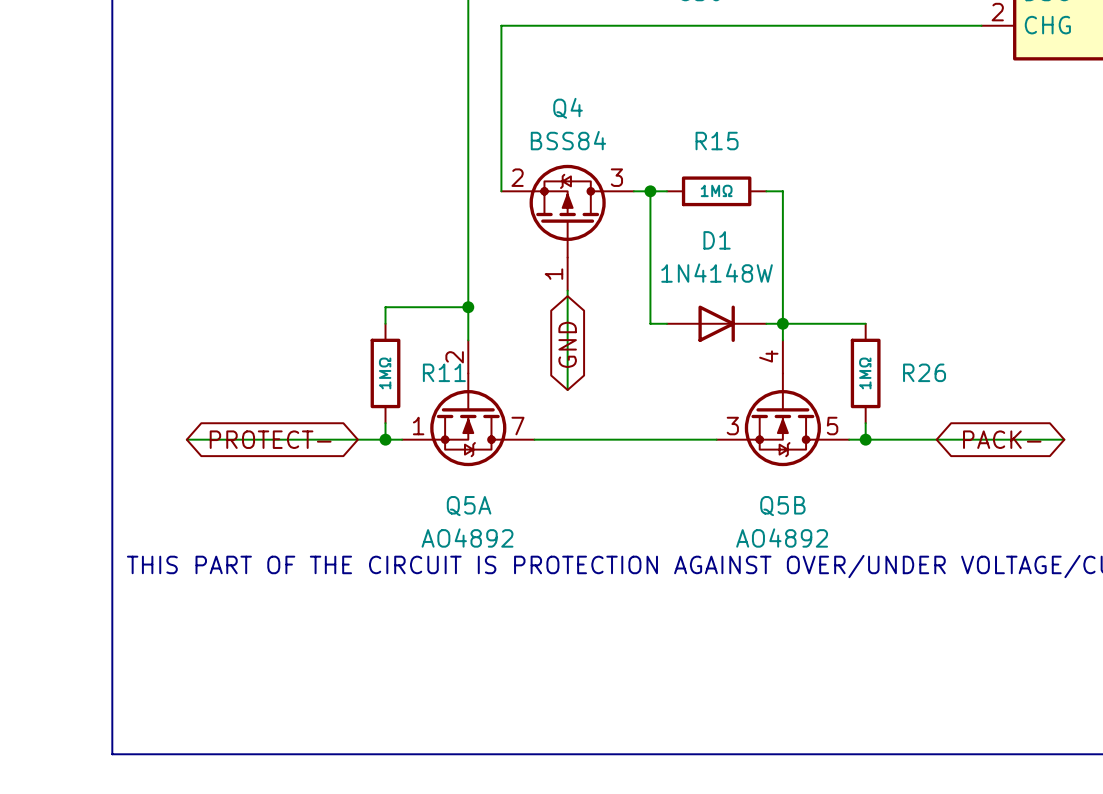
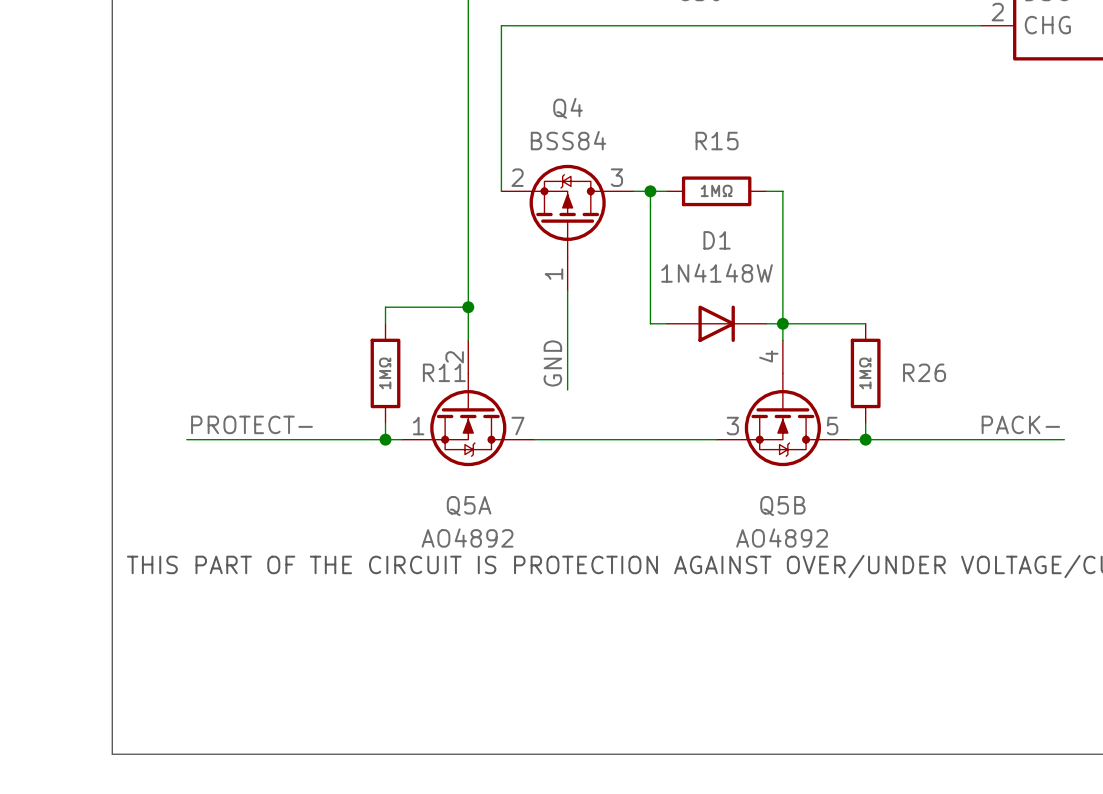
global label: GND (567, 344) -> none
label: none -> GND (552, 363)
label: none -> PROTECT- (251, 424)
label: none -> PACK- (1020, 424)
global label: PROTECT- (270, 439) -> none
global label: PACK- (1002, 439) -> none

